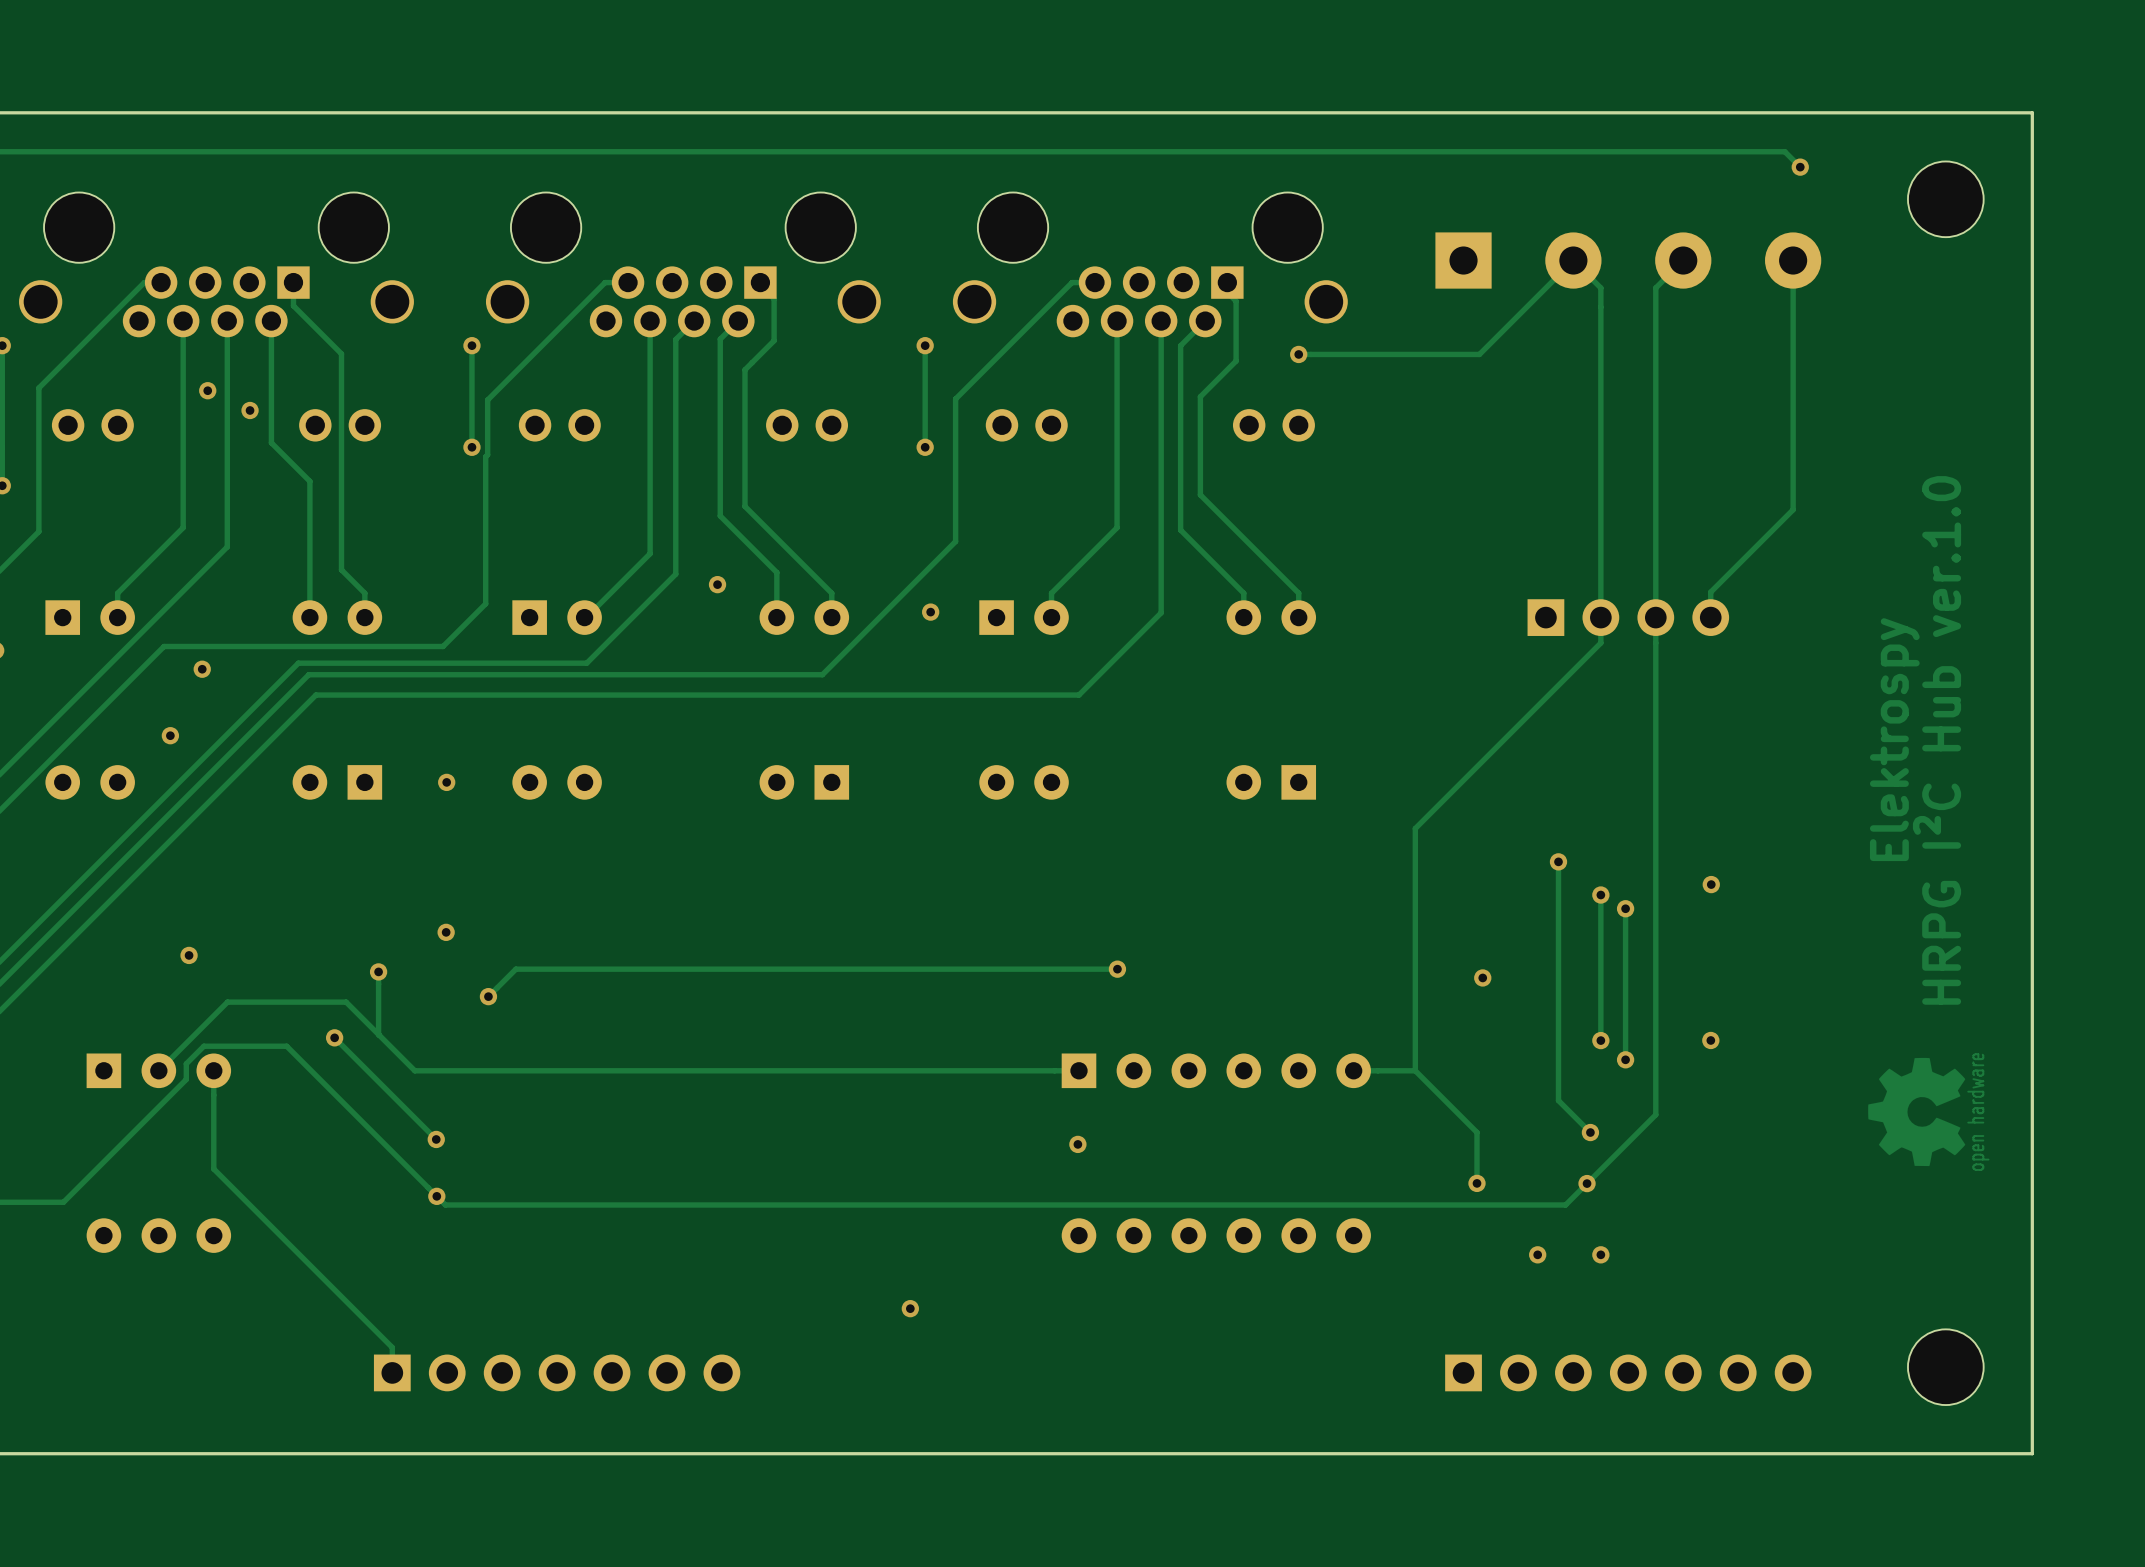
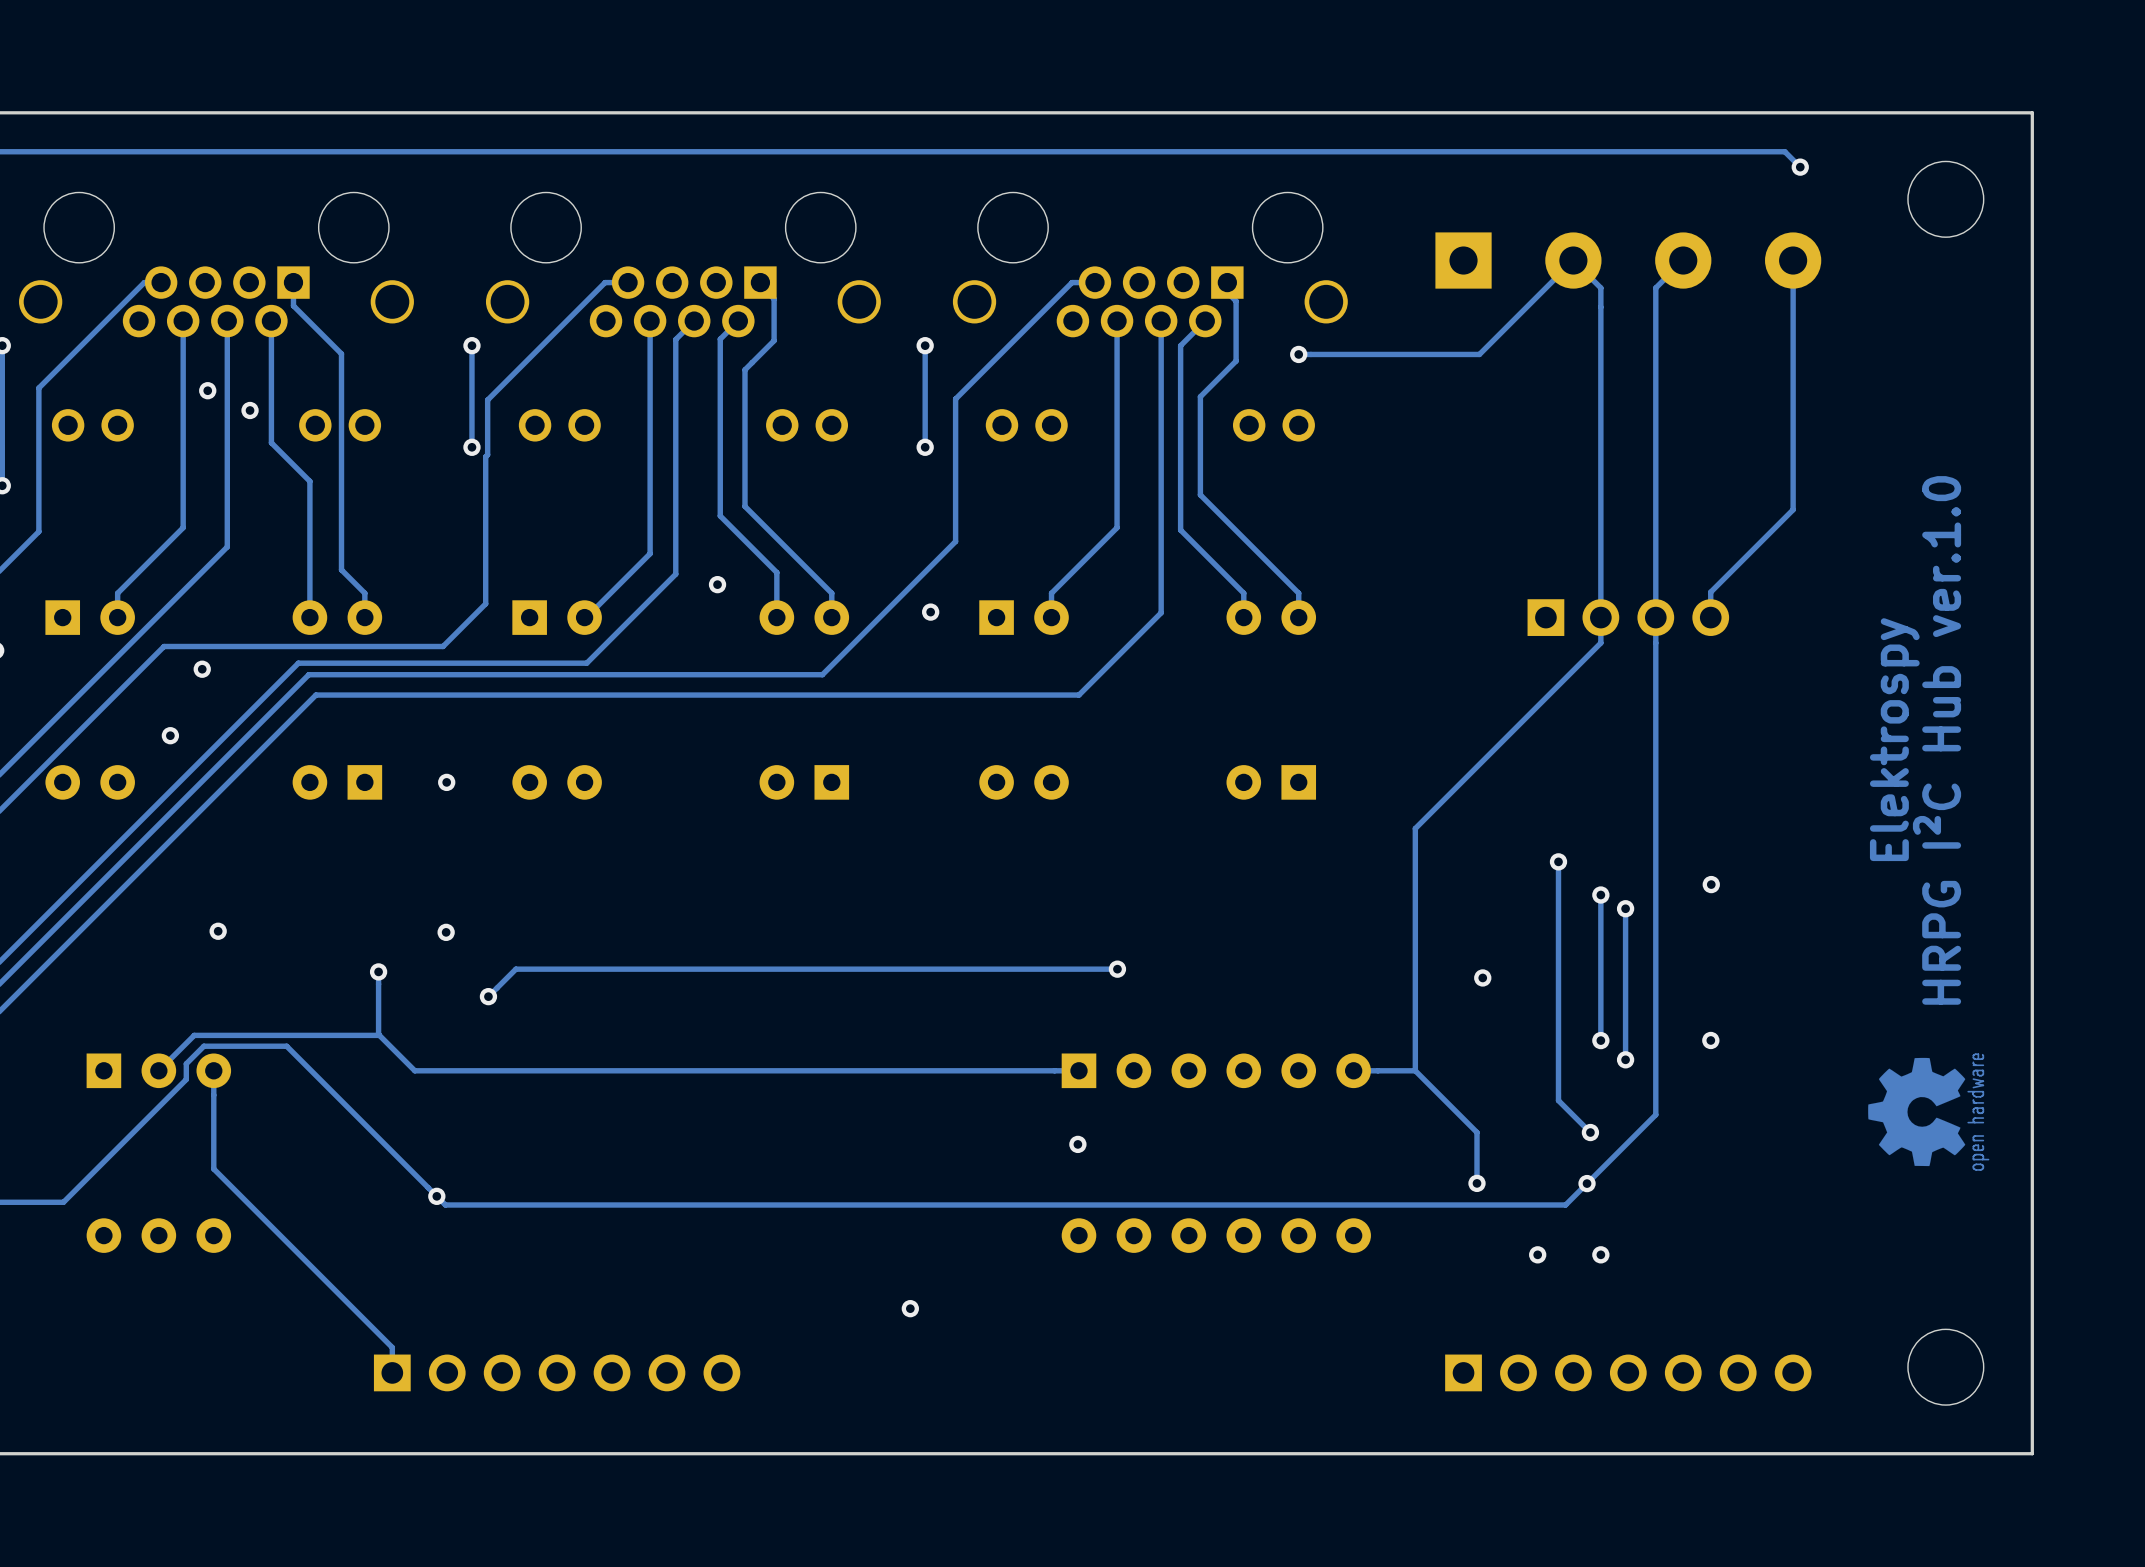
via position: (189, 955) -> (218, 931)
track: (378, 1034) (346, 1002) (227, 1002) (194, 1035) -> (379, 1035) (194, 1035)
track: (334, 1037) (436, 1139) -> none
via: (334, 1037) -> none
via: (436, 1139) -> none

